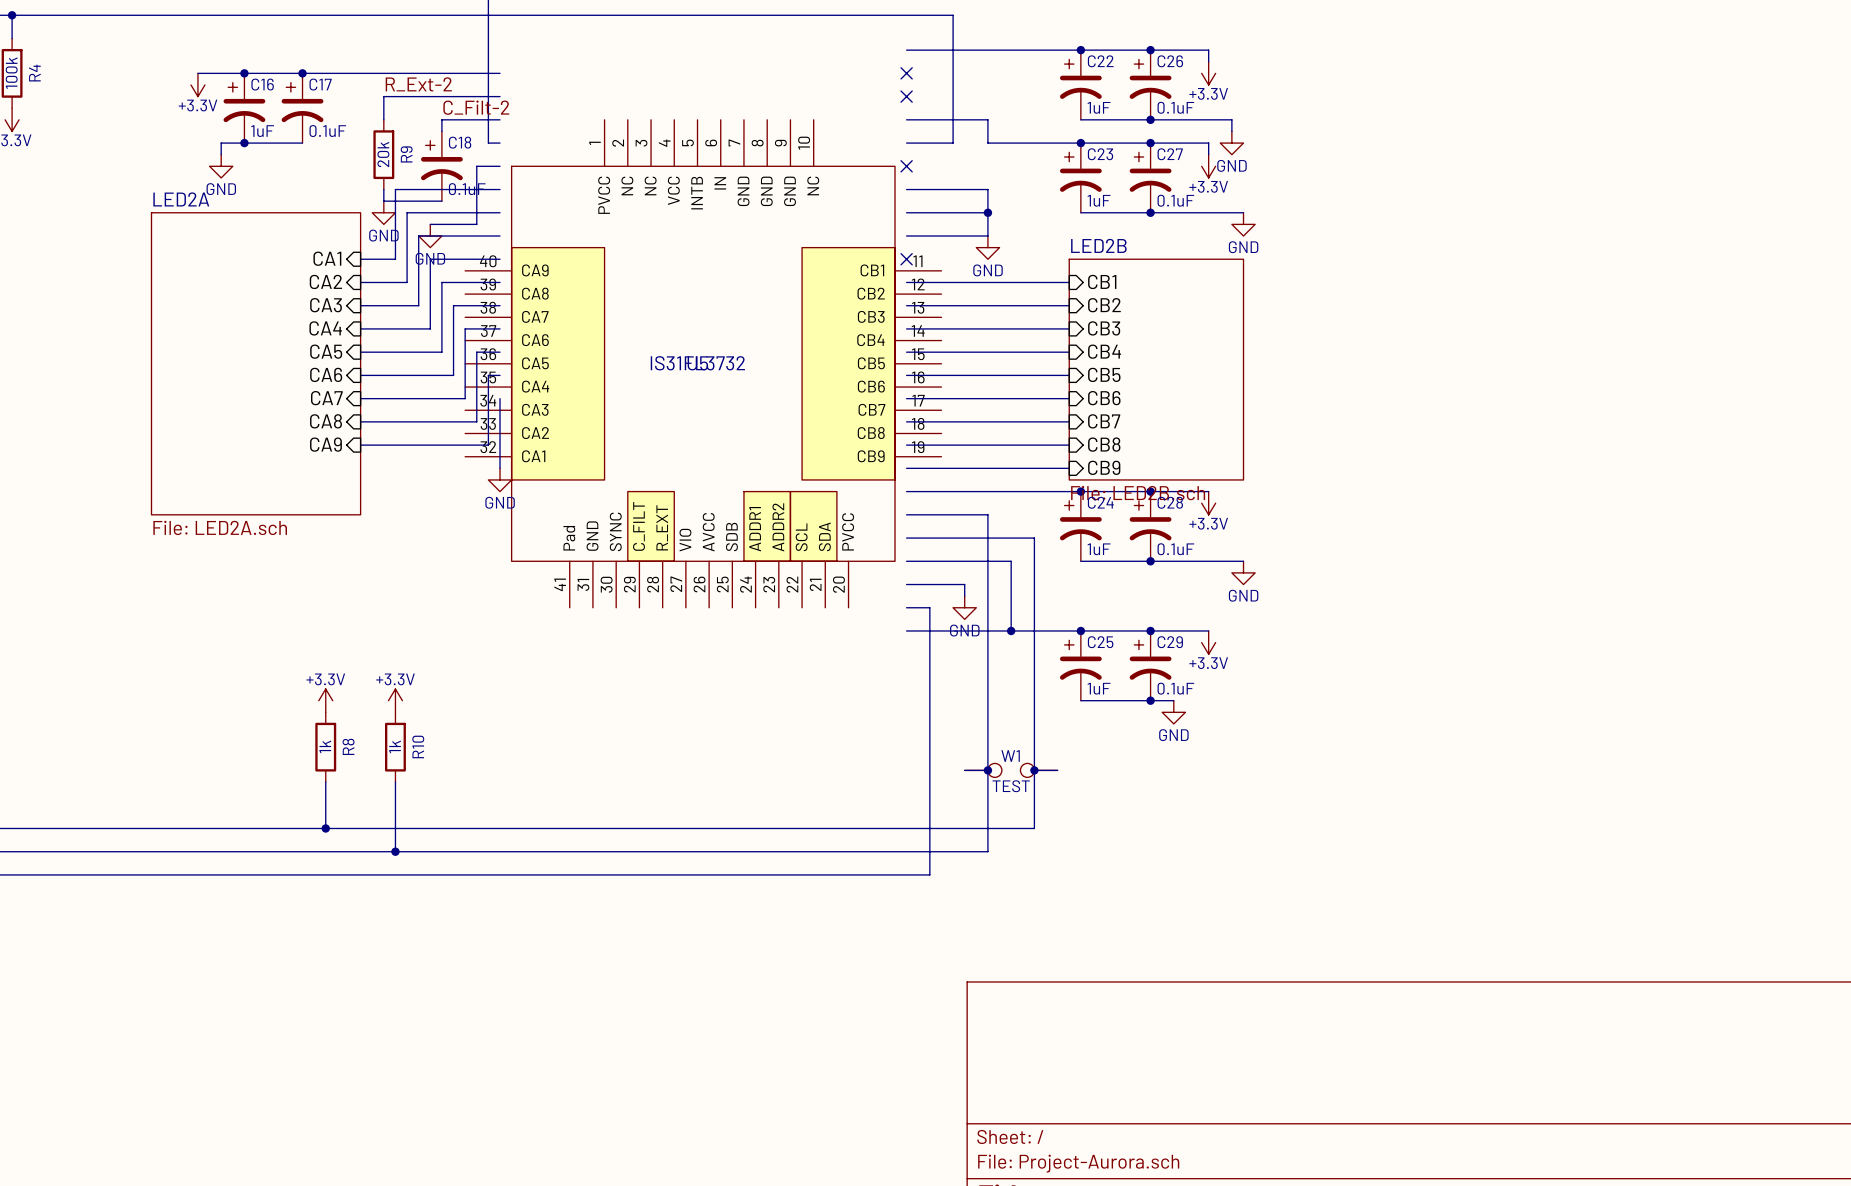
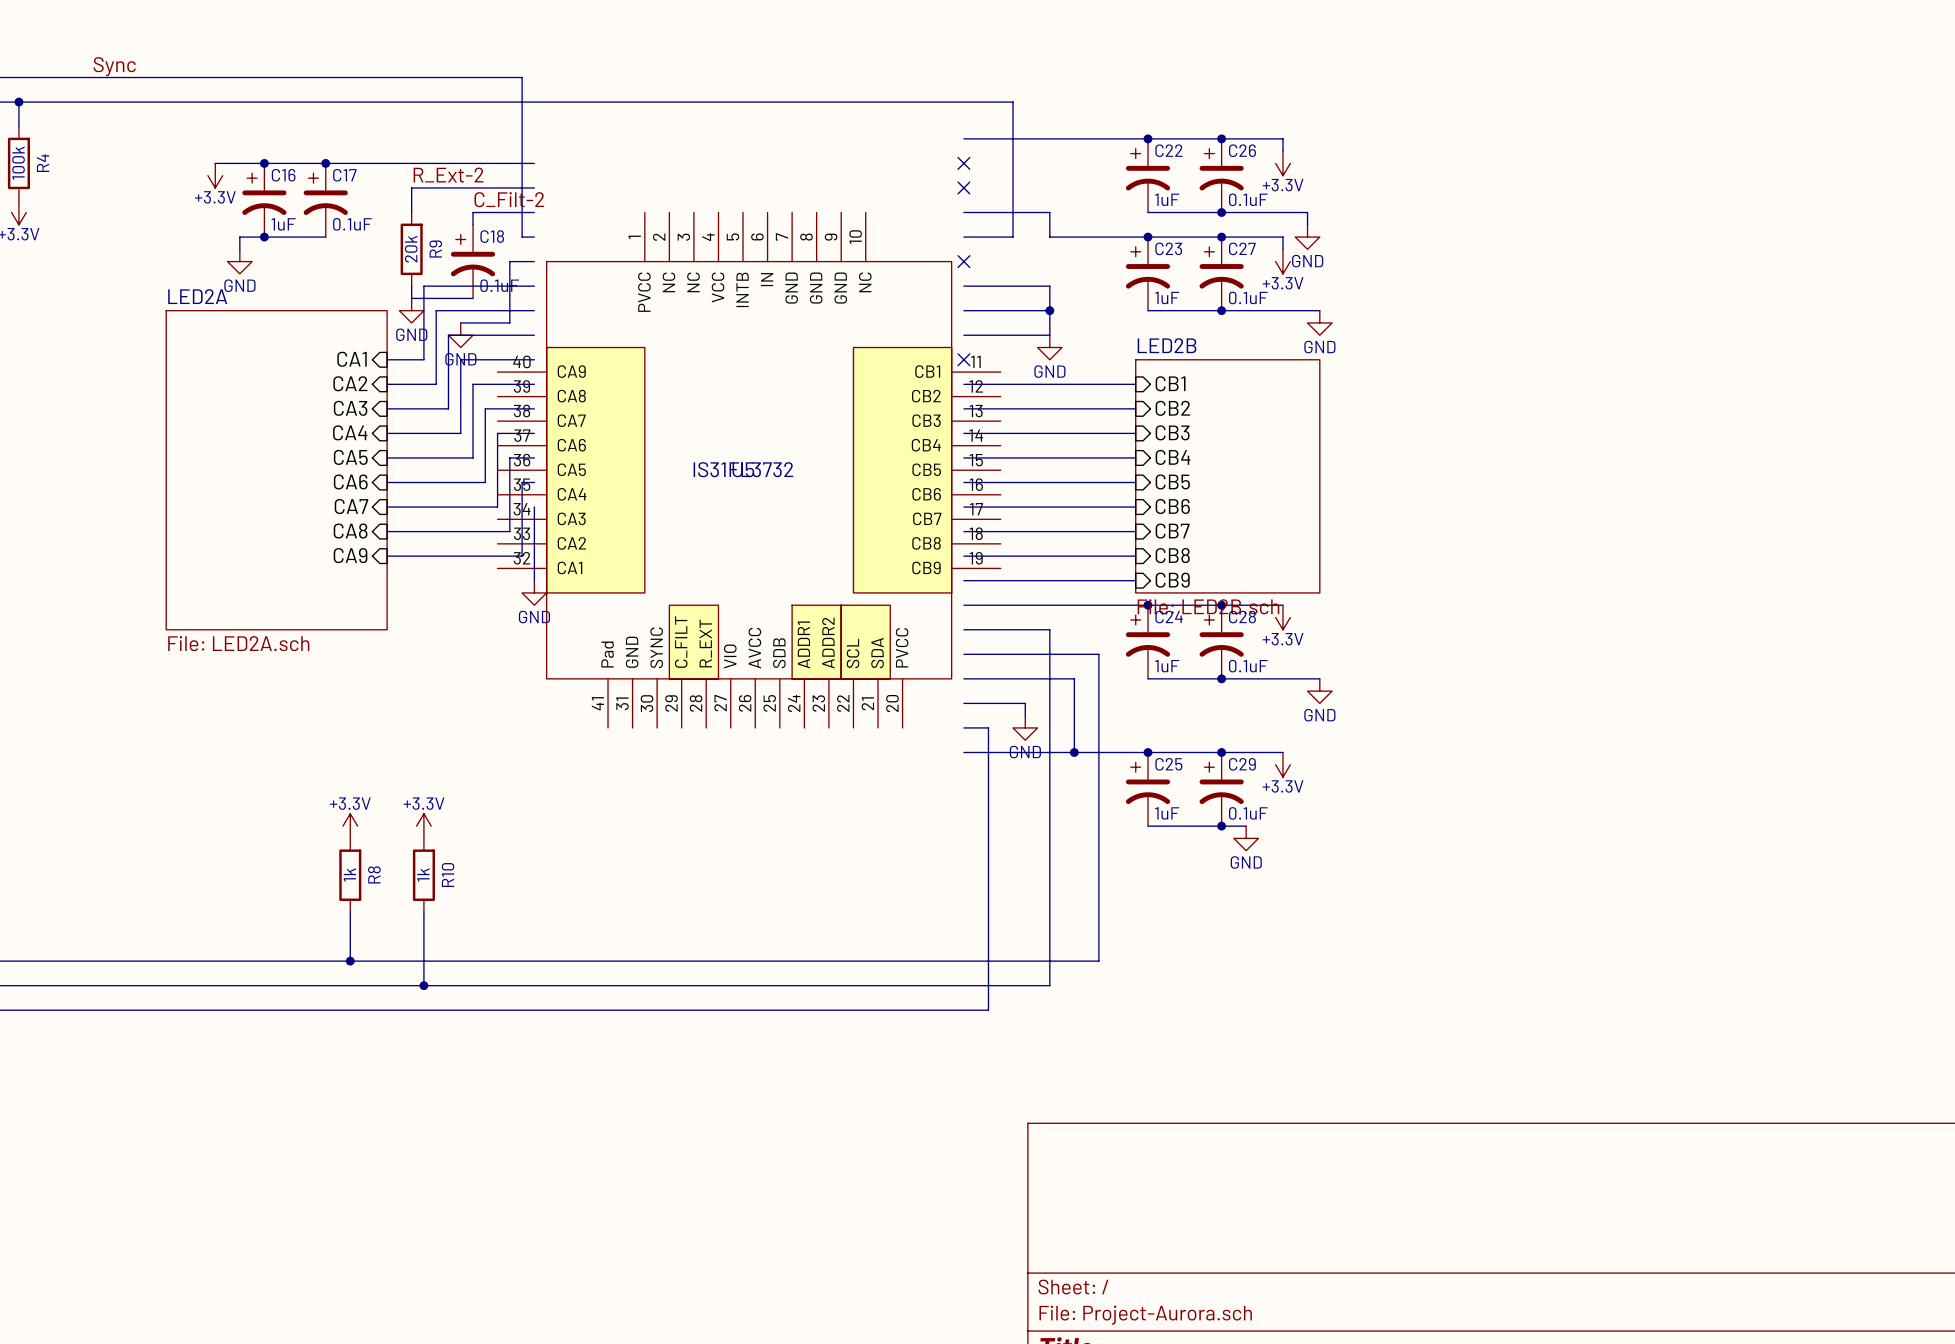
wire: (964, 770) (987, 770) -> none
junction: (987, 770) -> none
W1: TEST (1011, 770) -> none
wire: (1034, 770) (1057, 770) -> none
junction: (1034, 770) -> none

